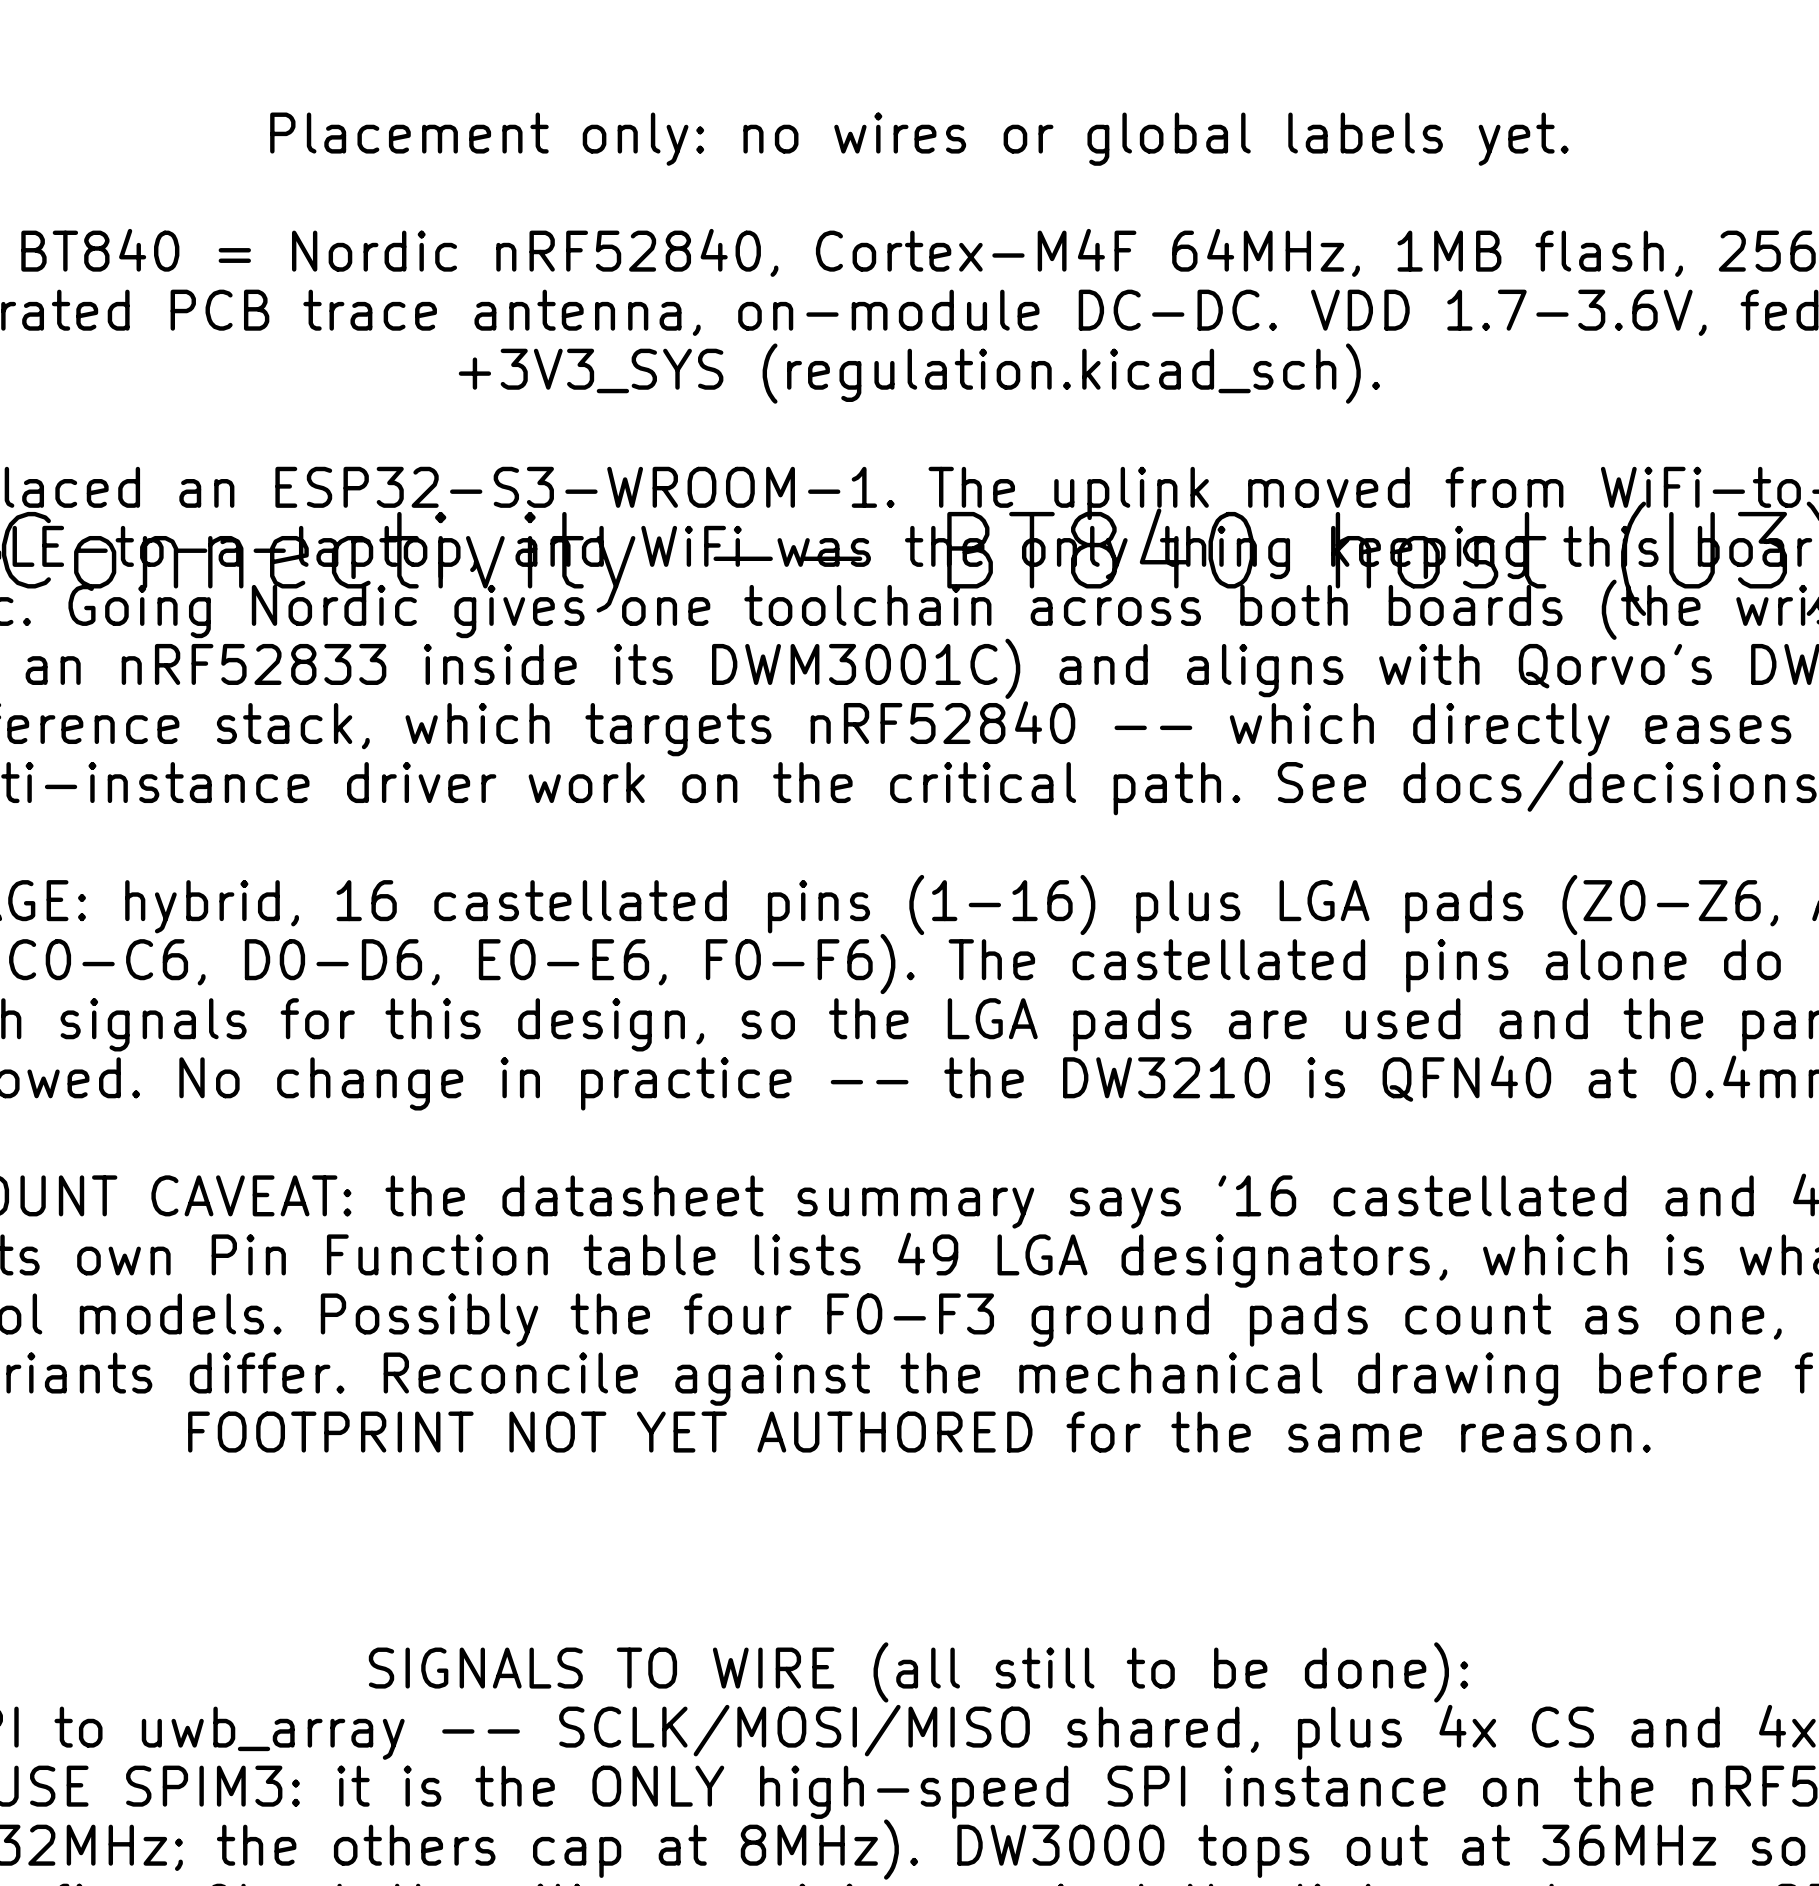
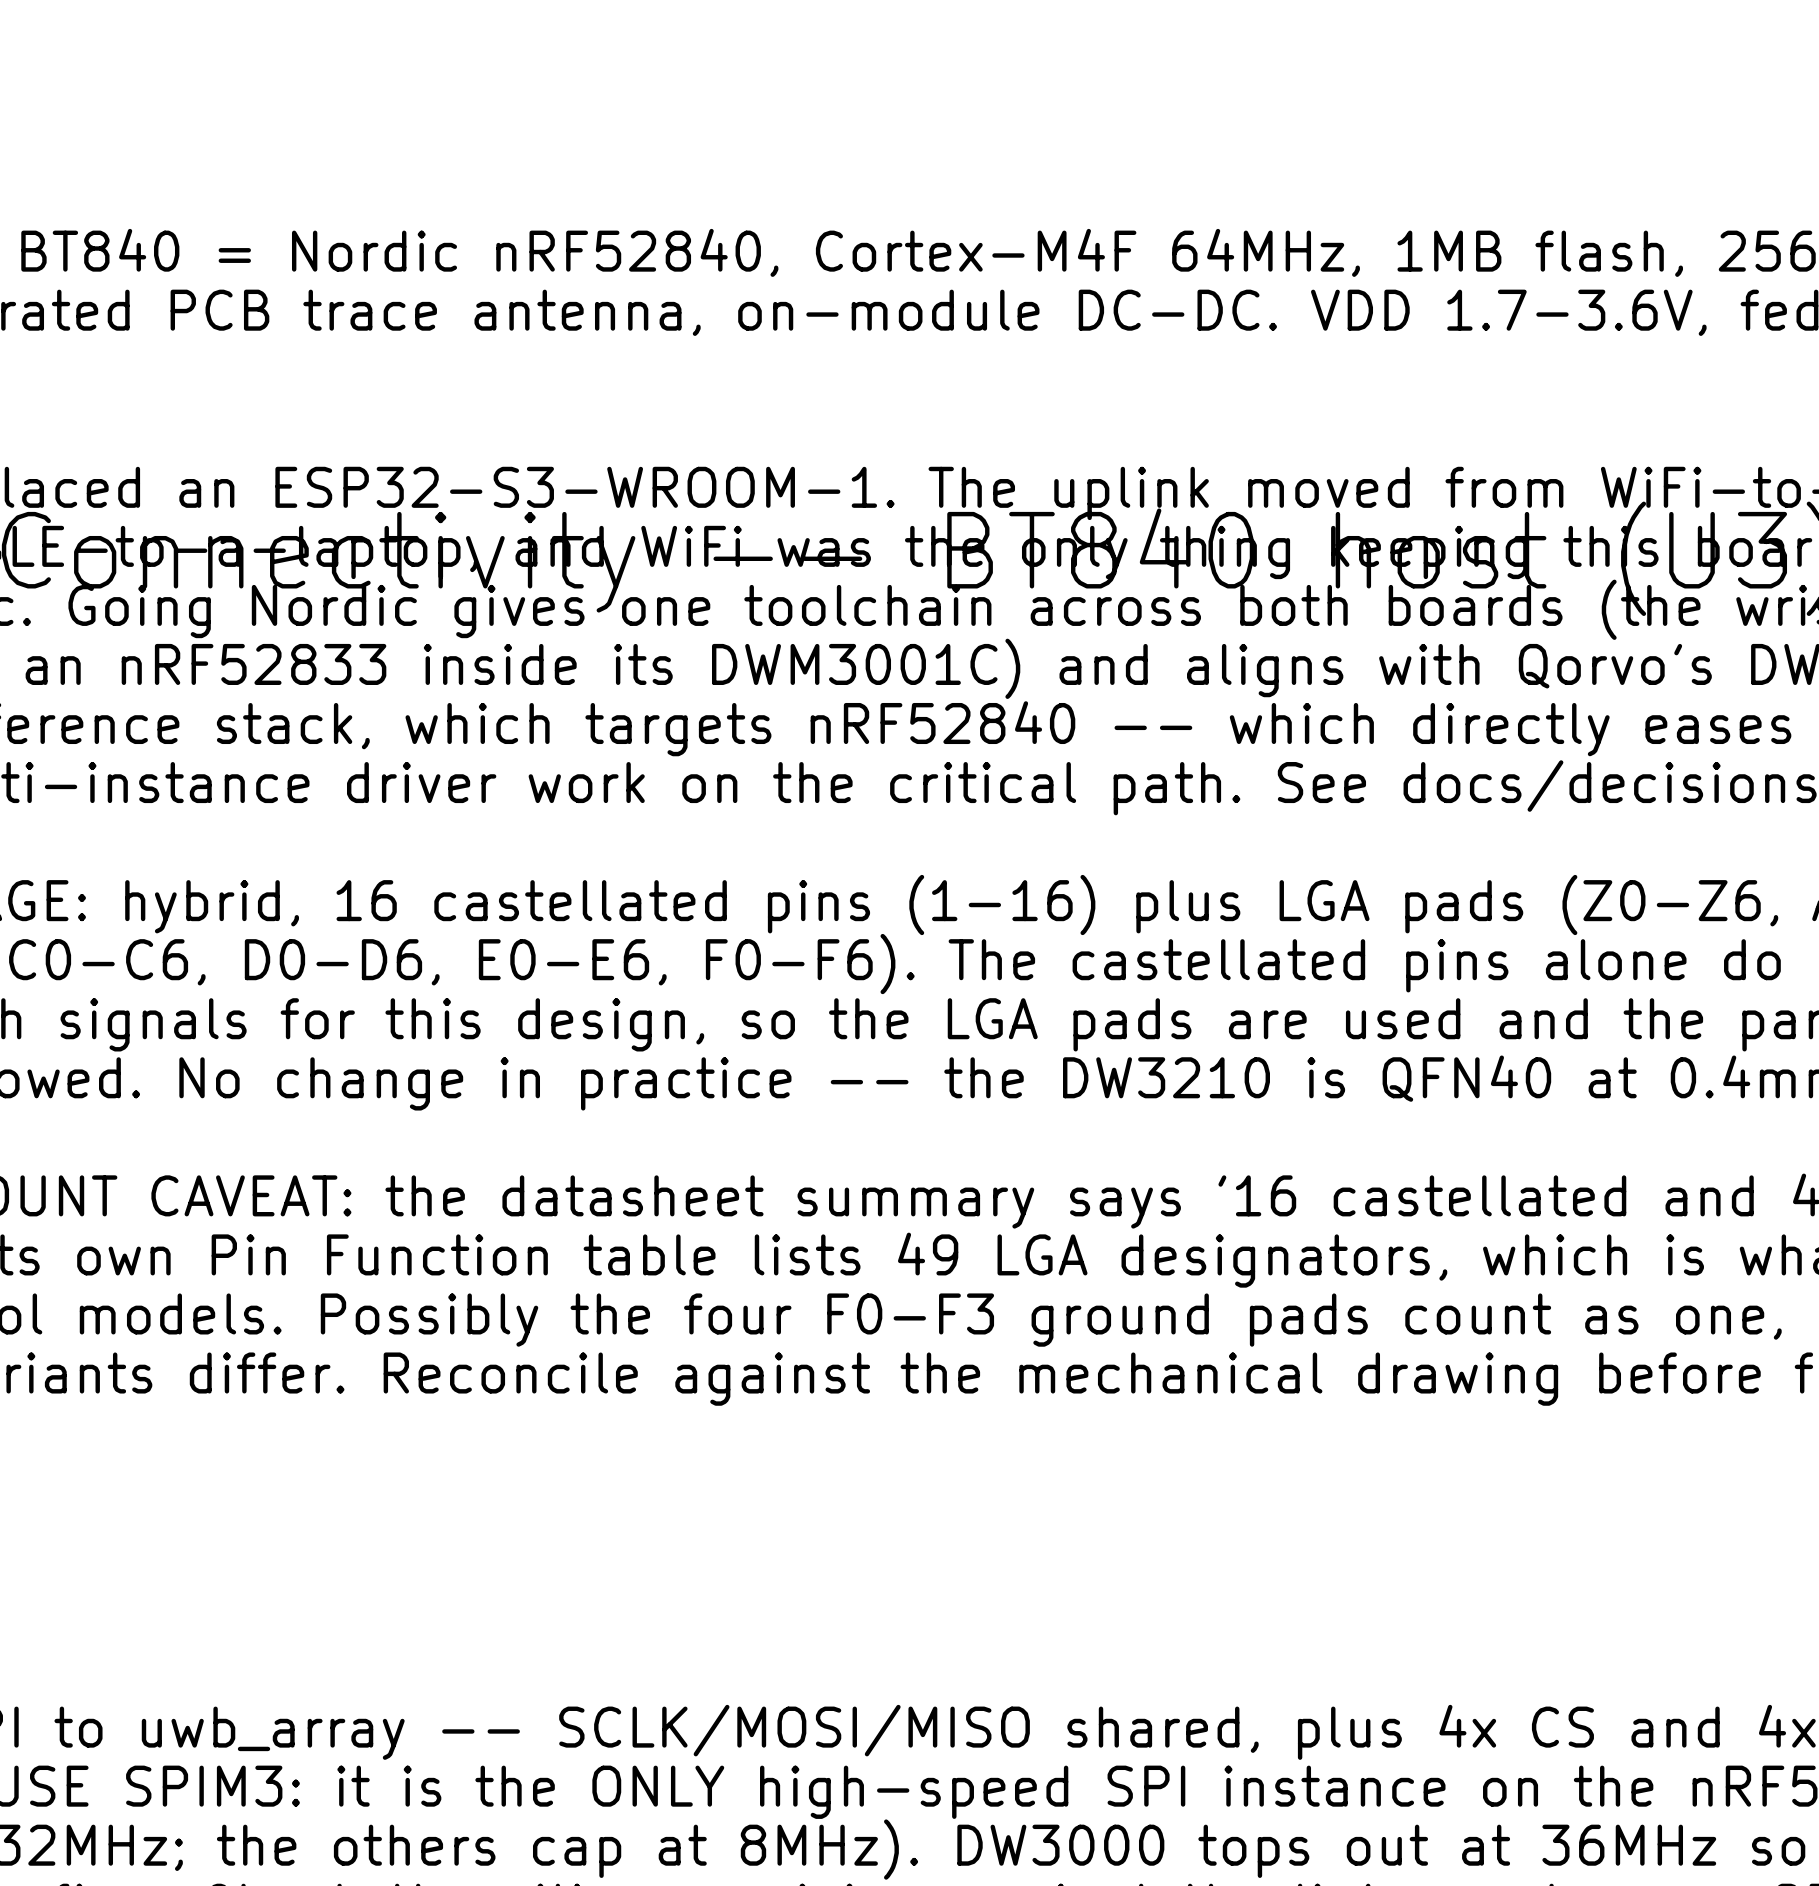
text: Placement only: no wires or global labels yet. (919, 139) -> none
text: +3V3_SYS (regulation.kicad_sch). (919, 373) -> none
text: FOOTPRINT NOT YET AUTHORED for the same reason. (919, 1432) -> none
text: SIGNALS TO WIRE (all still to be done): (918, 1672) -> none

